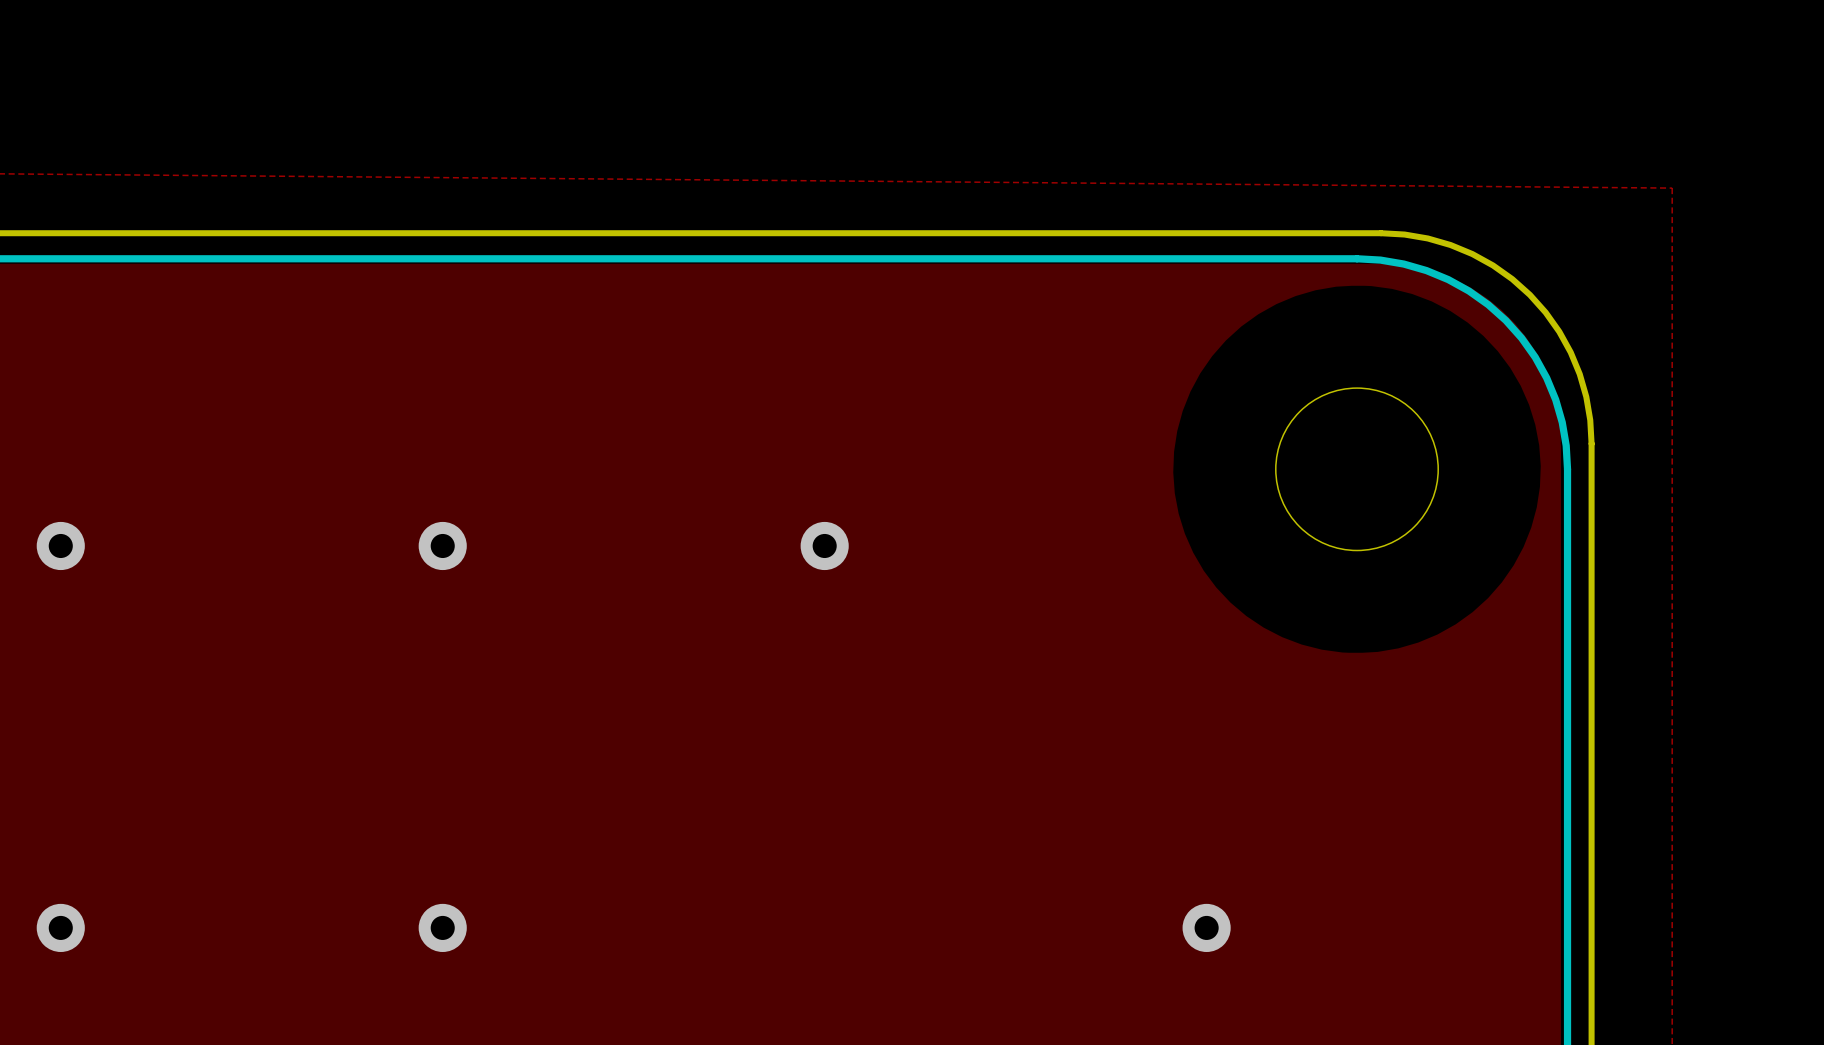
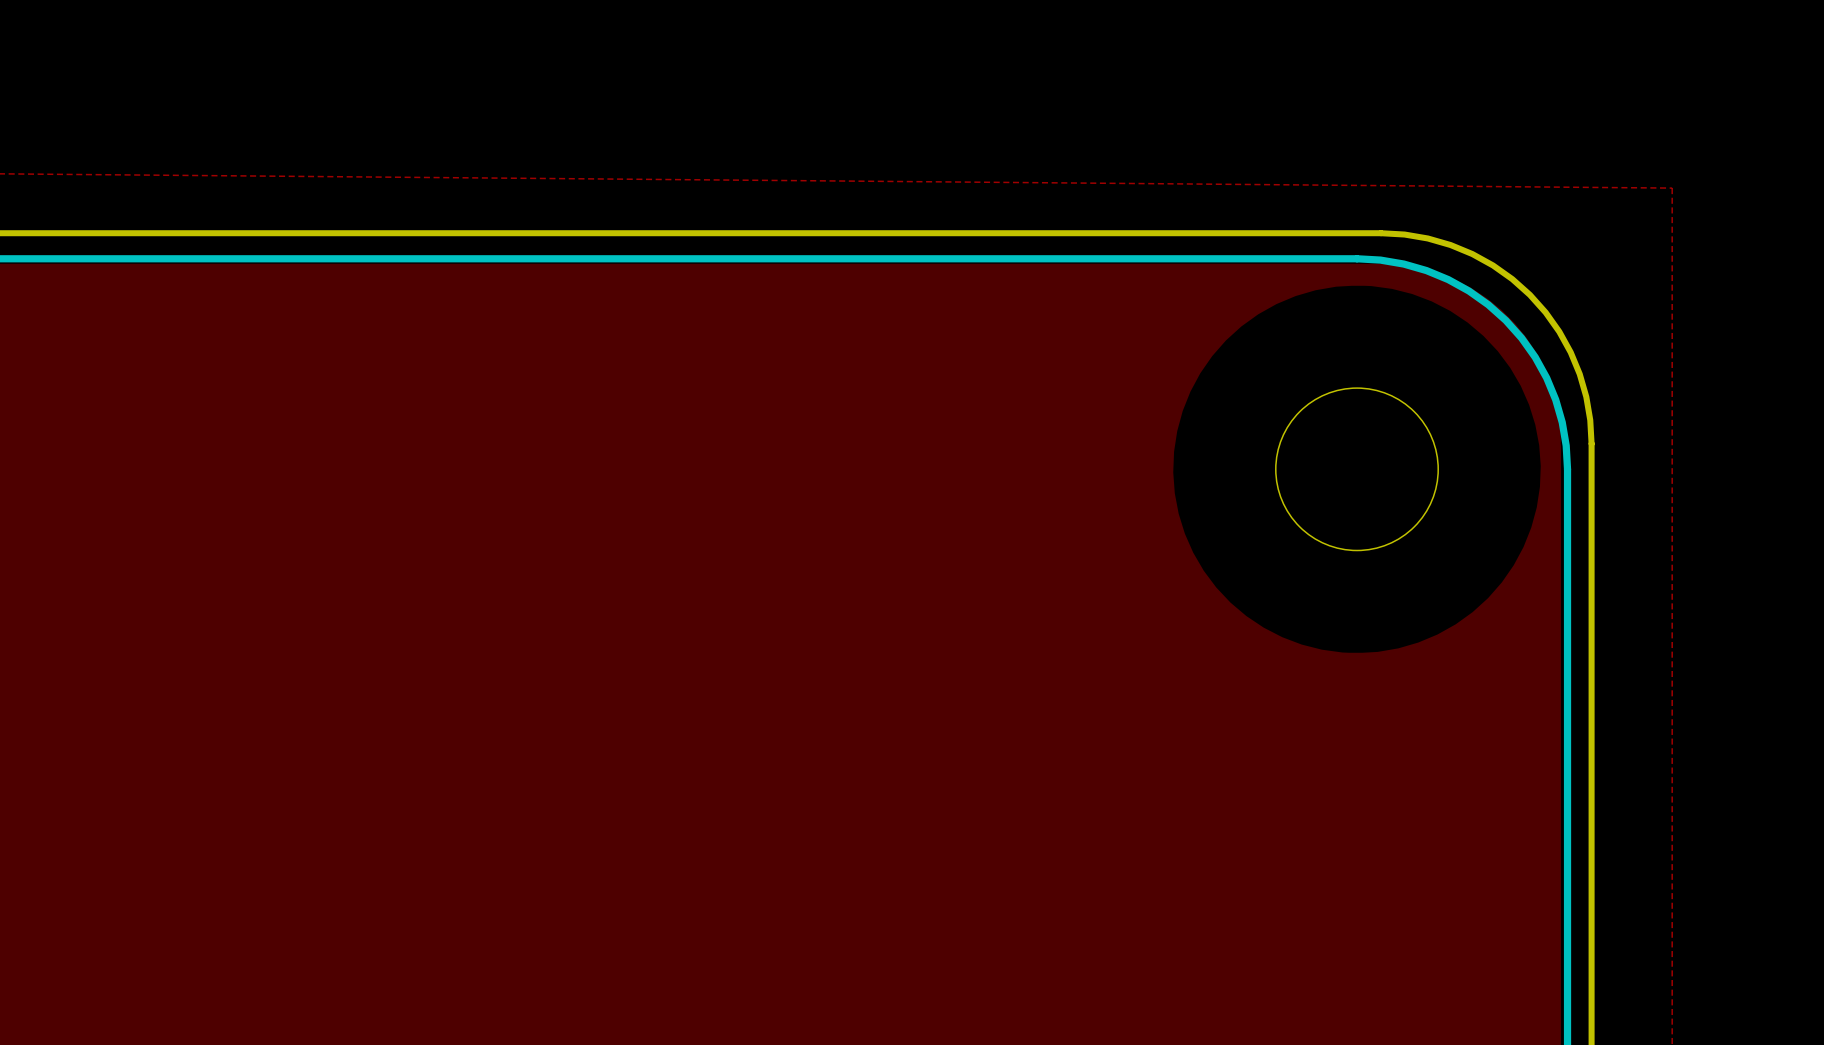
via: (60, 545) -> none
via: (442, 545) -> none
via: (824, 545) -> none
via: (60, 927) -> none
via: (442, 927) -> none
via: (1206, 927) -> none

